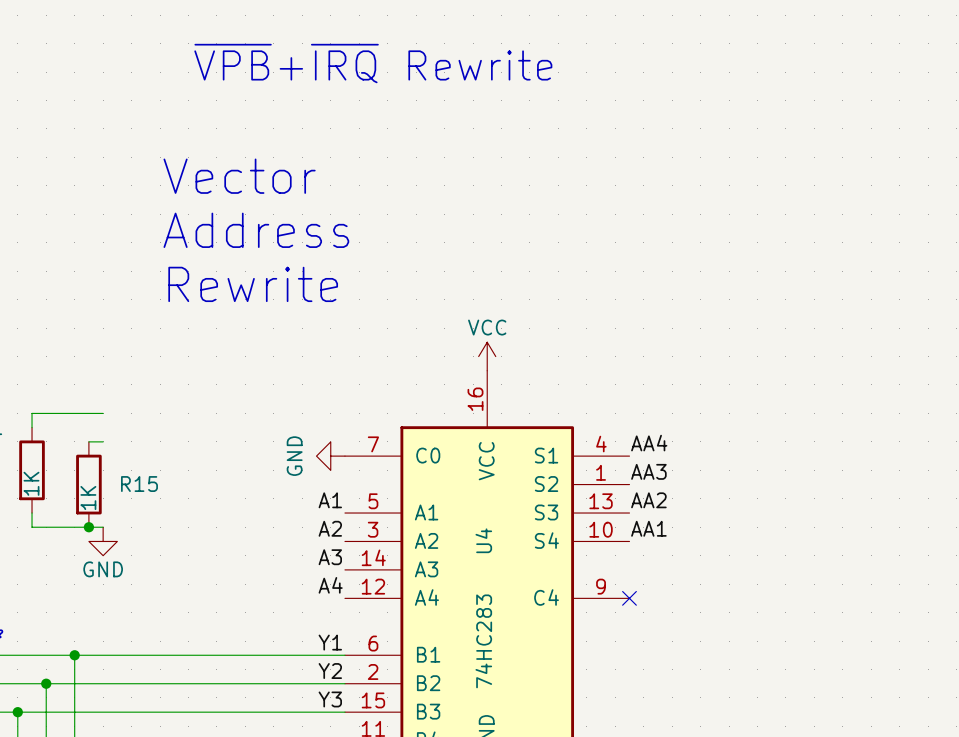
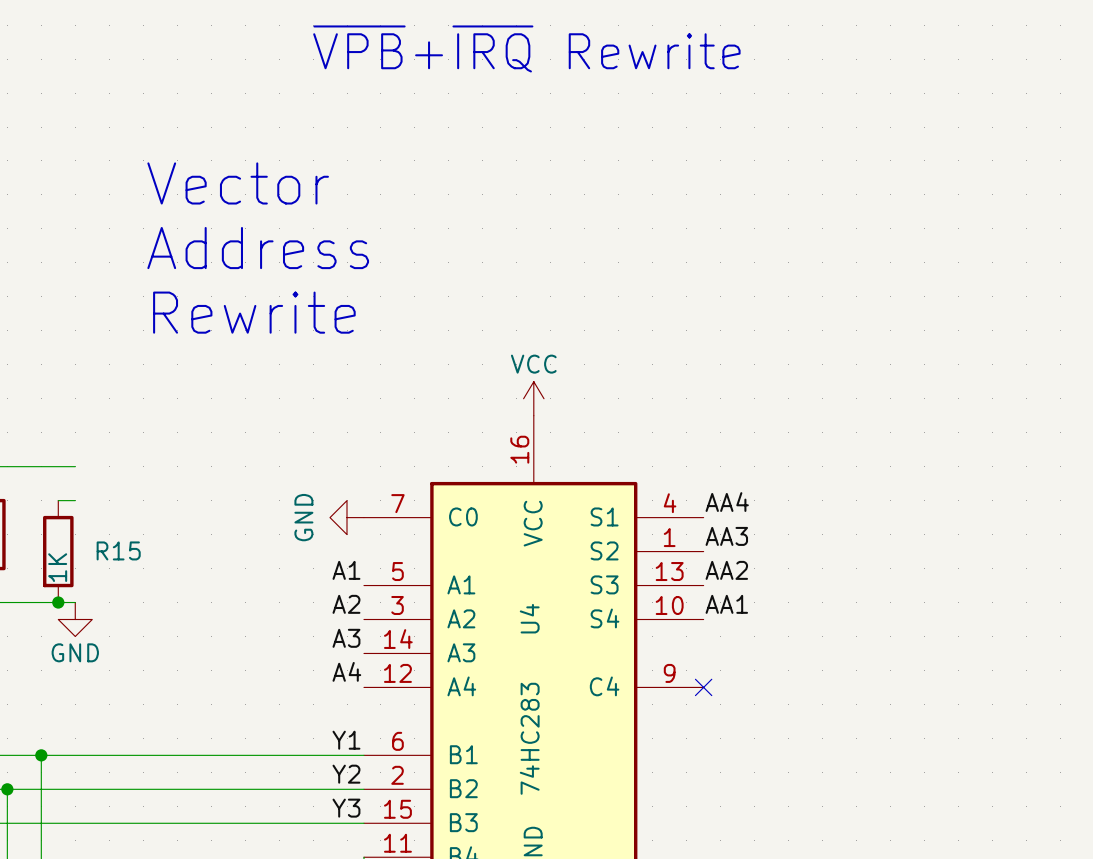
text position: ~{VPB}+~{IRQ} Rewrite (373, 63) -> ~{VPB}+~{IRQ} Rewrite (526, 48)

